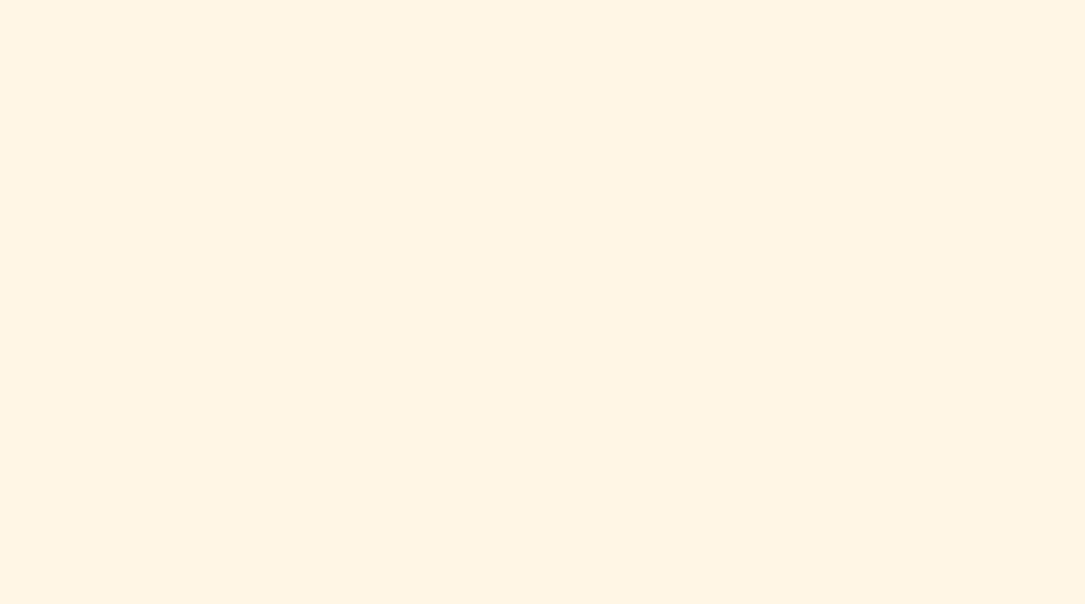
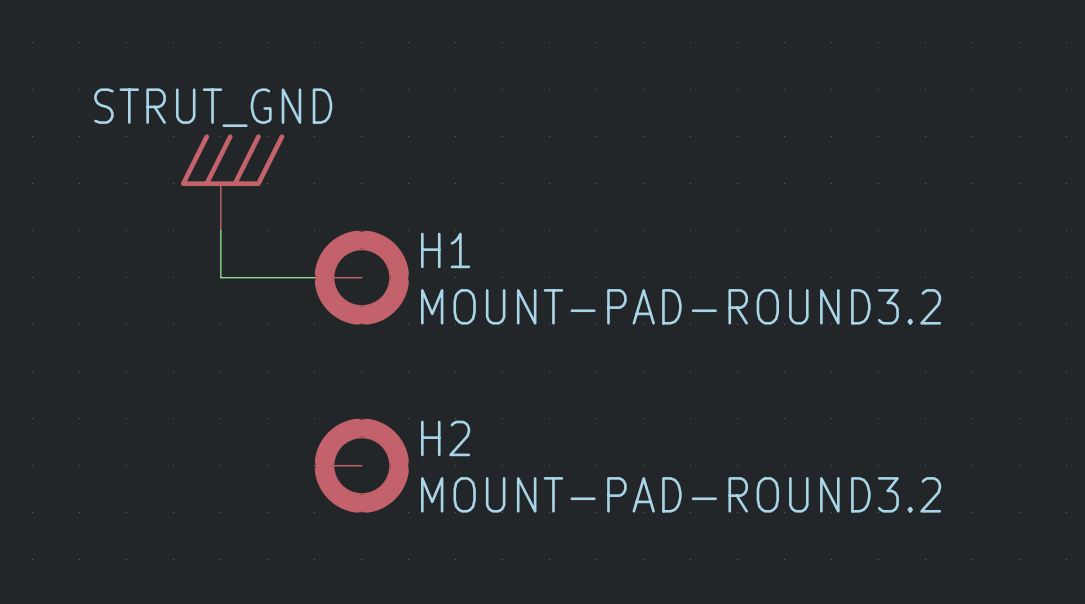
power symbol: none -> STRUT_GND (232, 182)
wire: none -> (220, 230) (220, 277) (314, 277)
H1: none -> MOUNT-PAD-ROUND3.2 (361, 277)
H2: none -> MOUNT-PAD-ROUND3.2 (361, 465)

